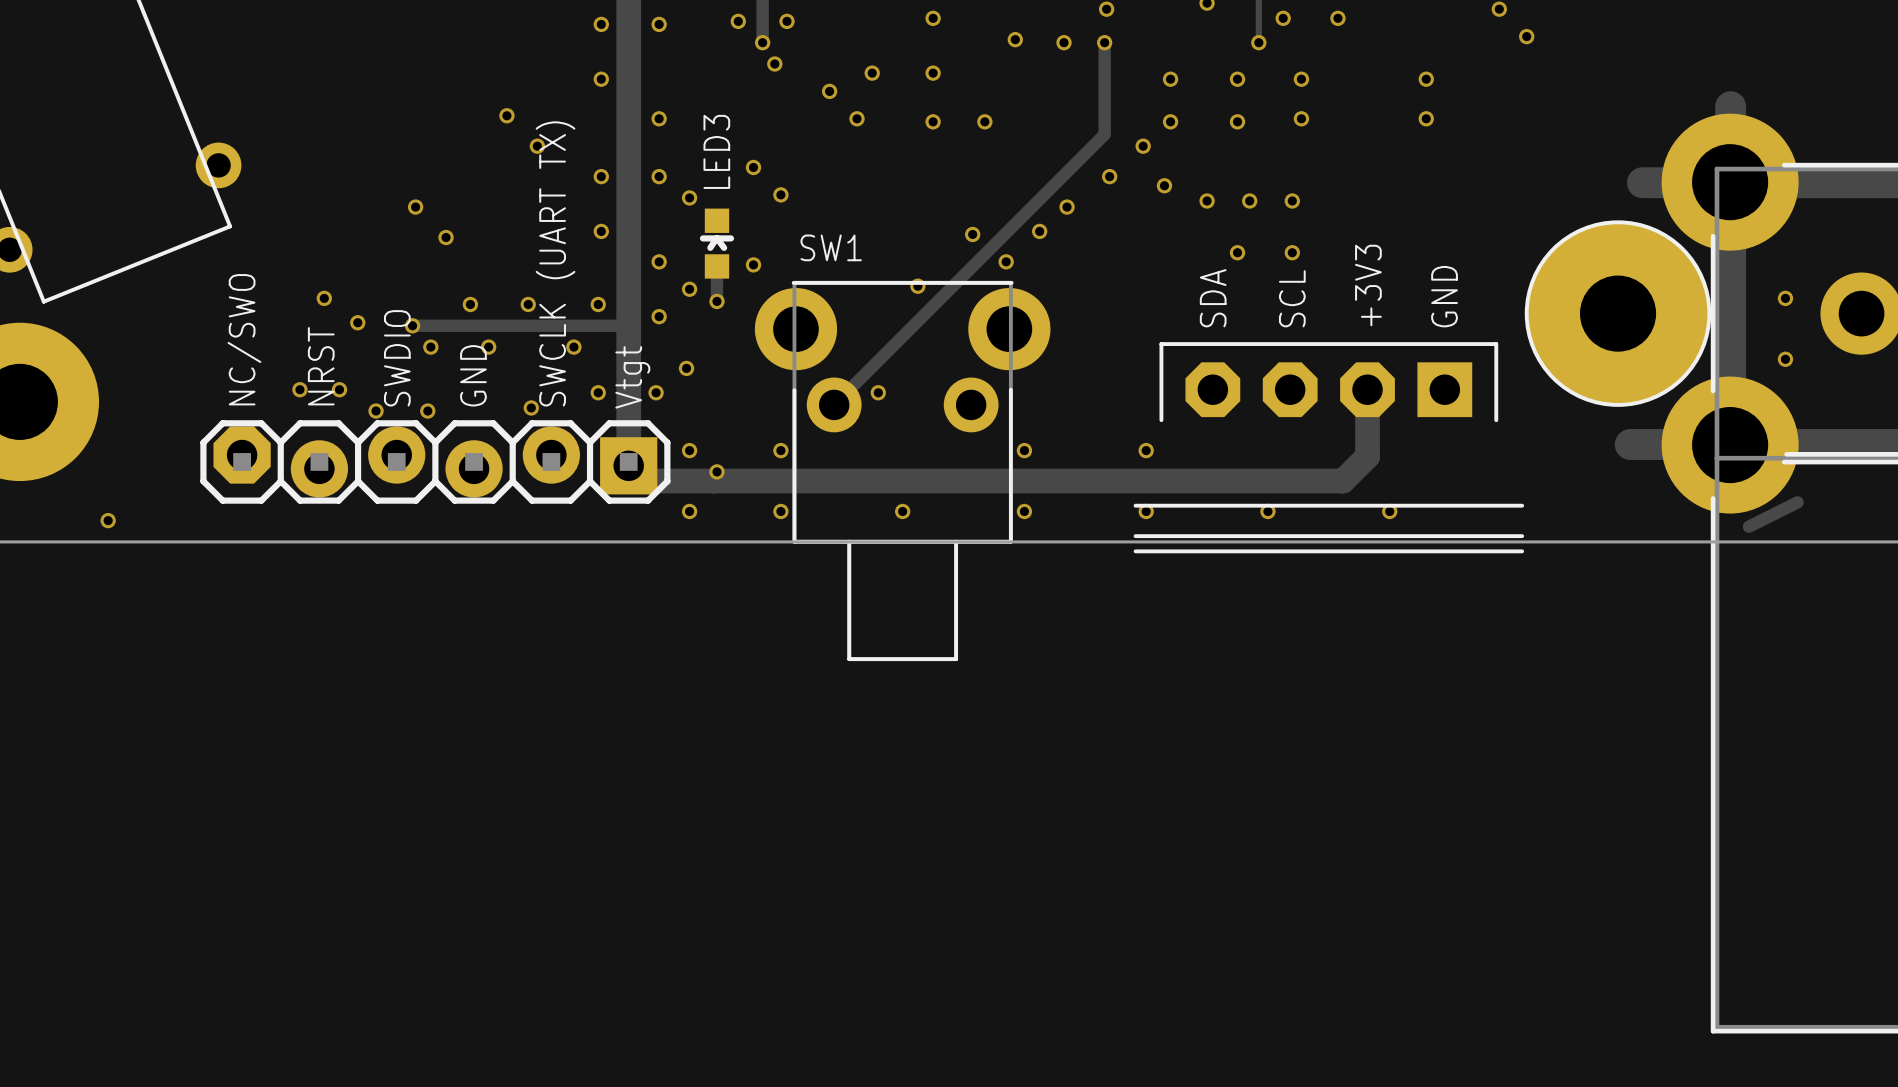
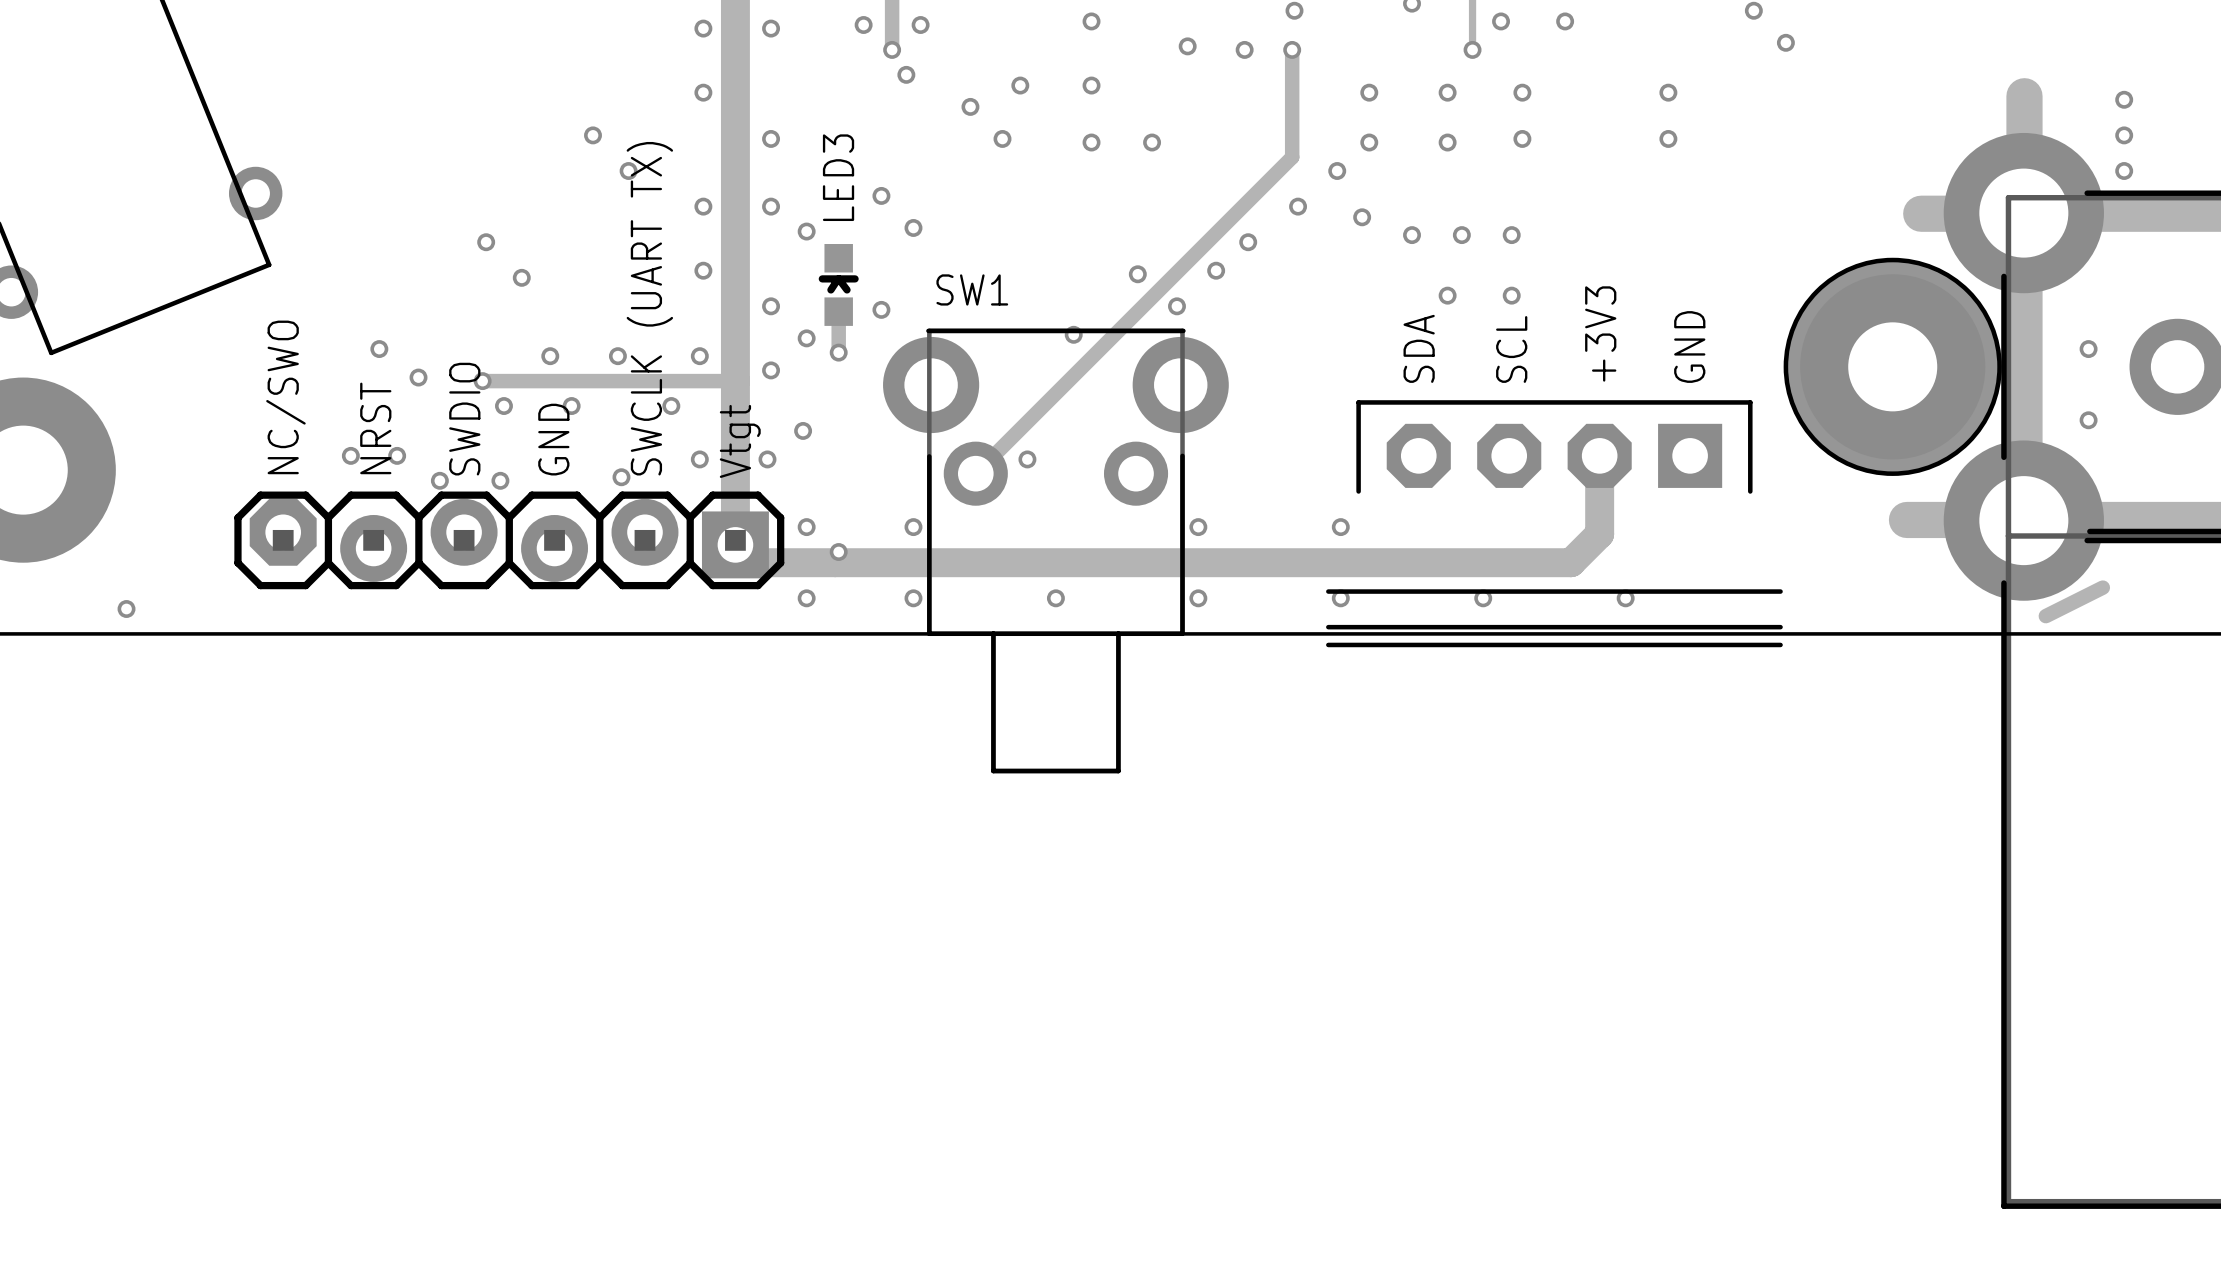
track: none -> (2024, 96) (2024, 124)
via: none -> (2124, 99)
via: none -> (2124, 135)
via: none -> (2124, 171)

